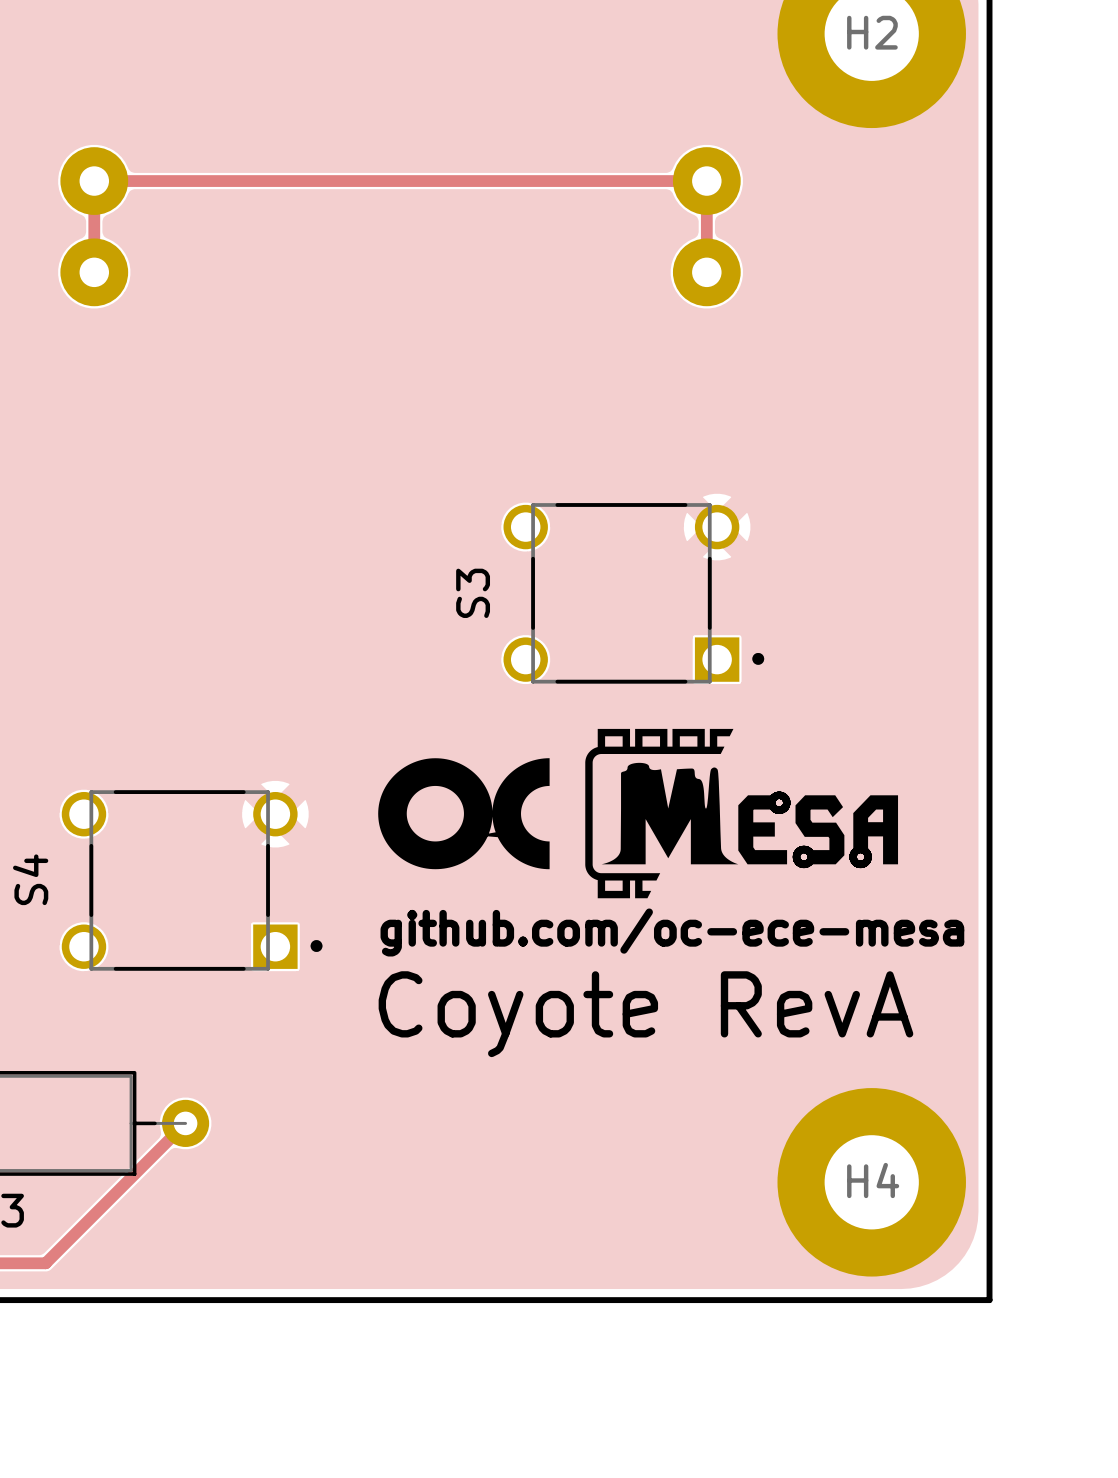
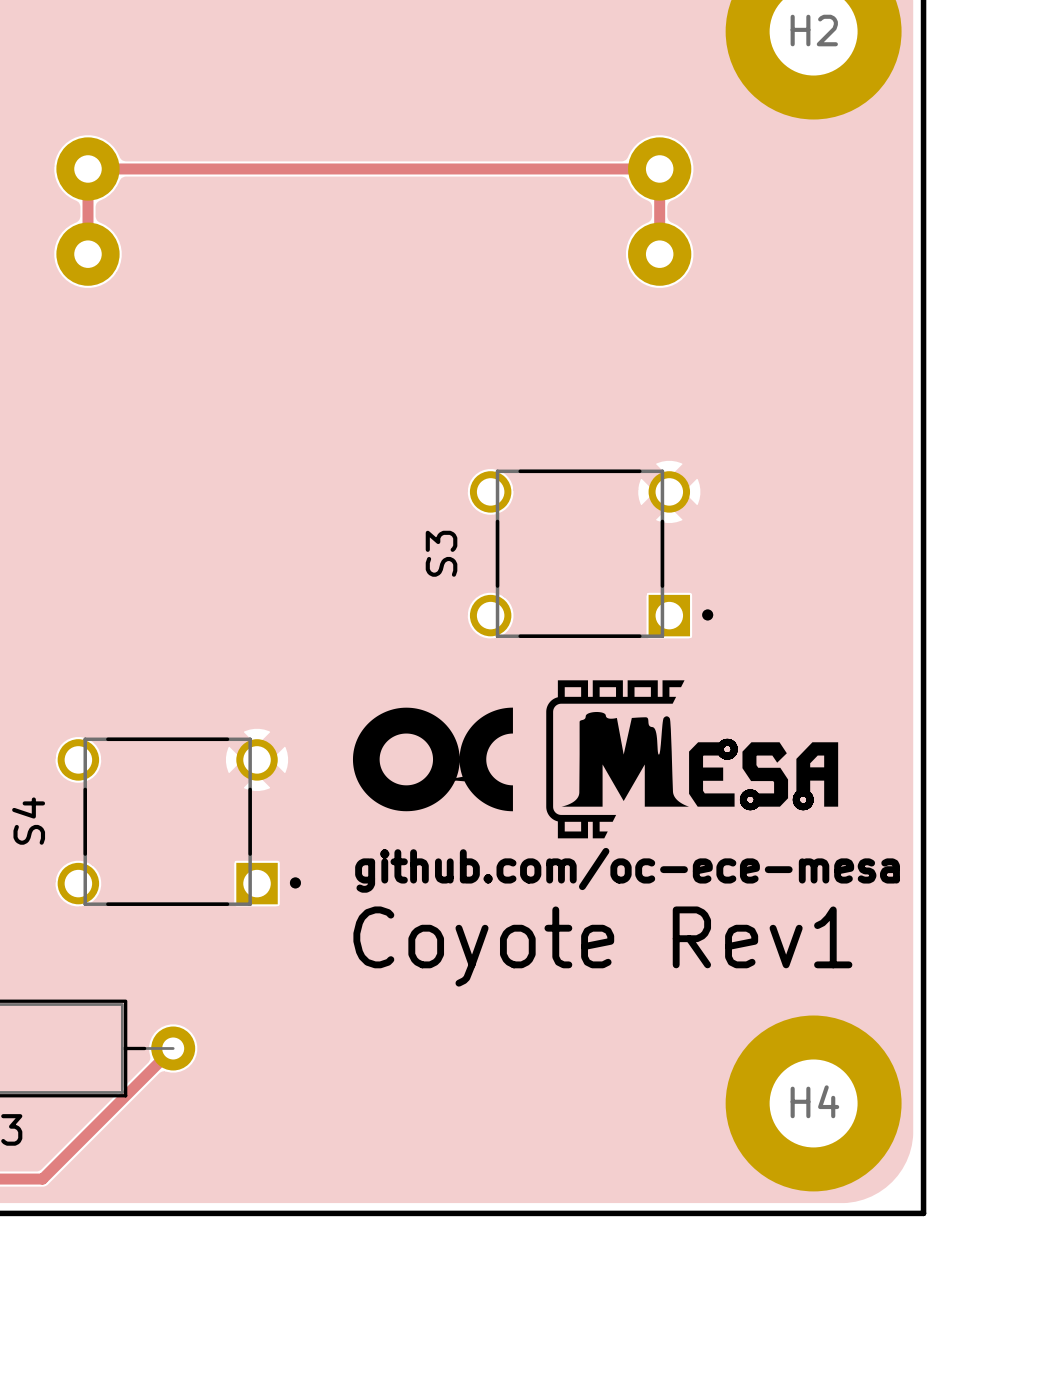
text: Coyote RevA (645, 1014) -> Coyote Rev1 (602, 946)

